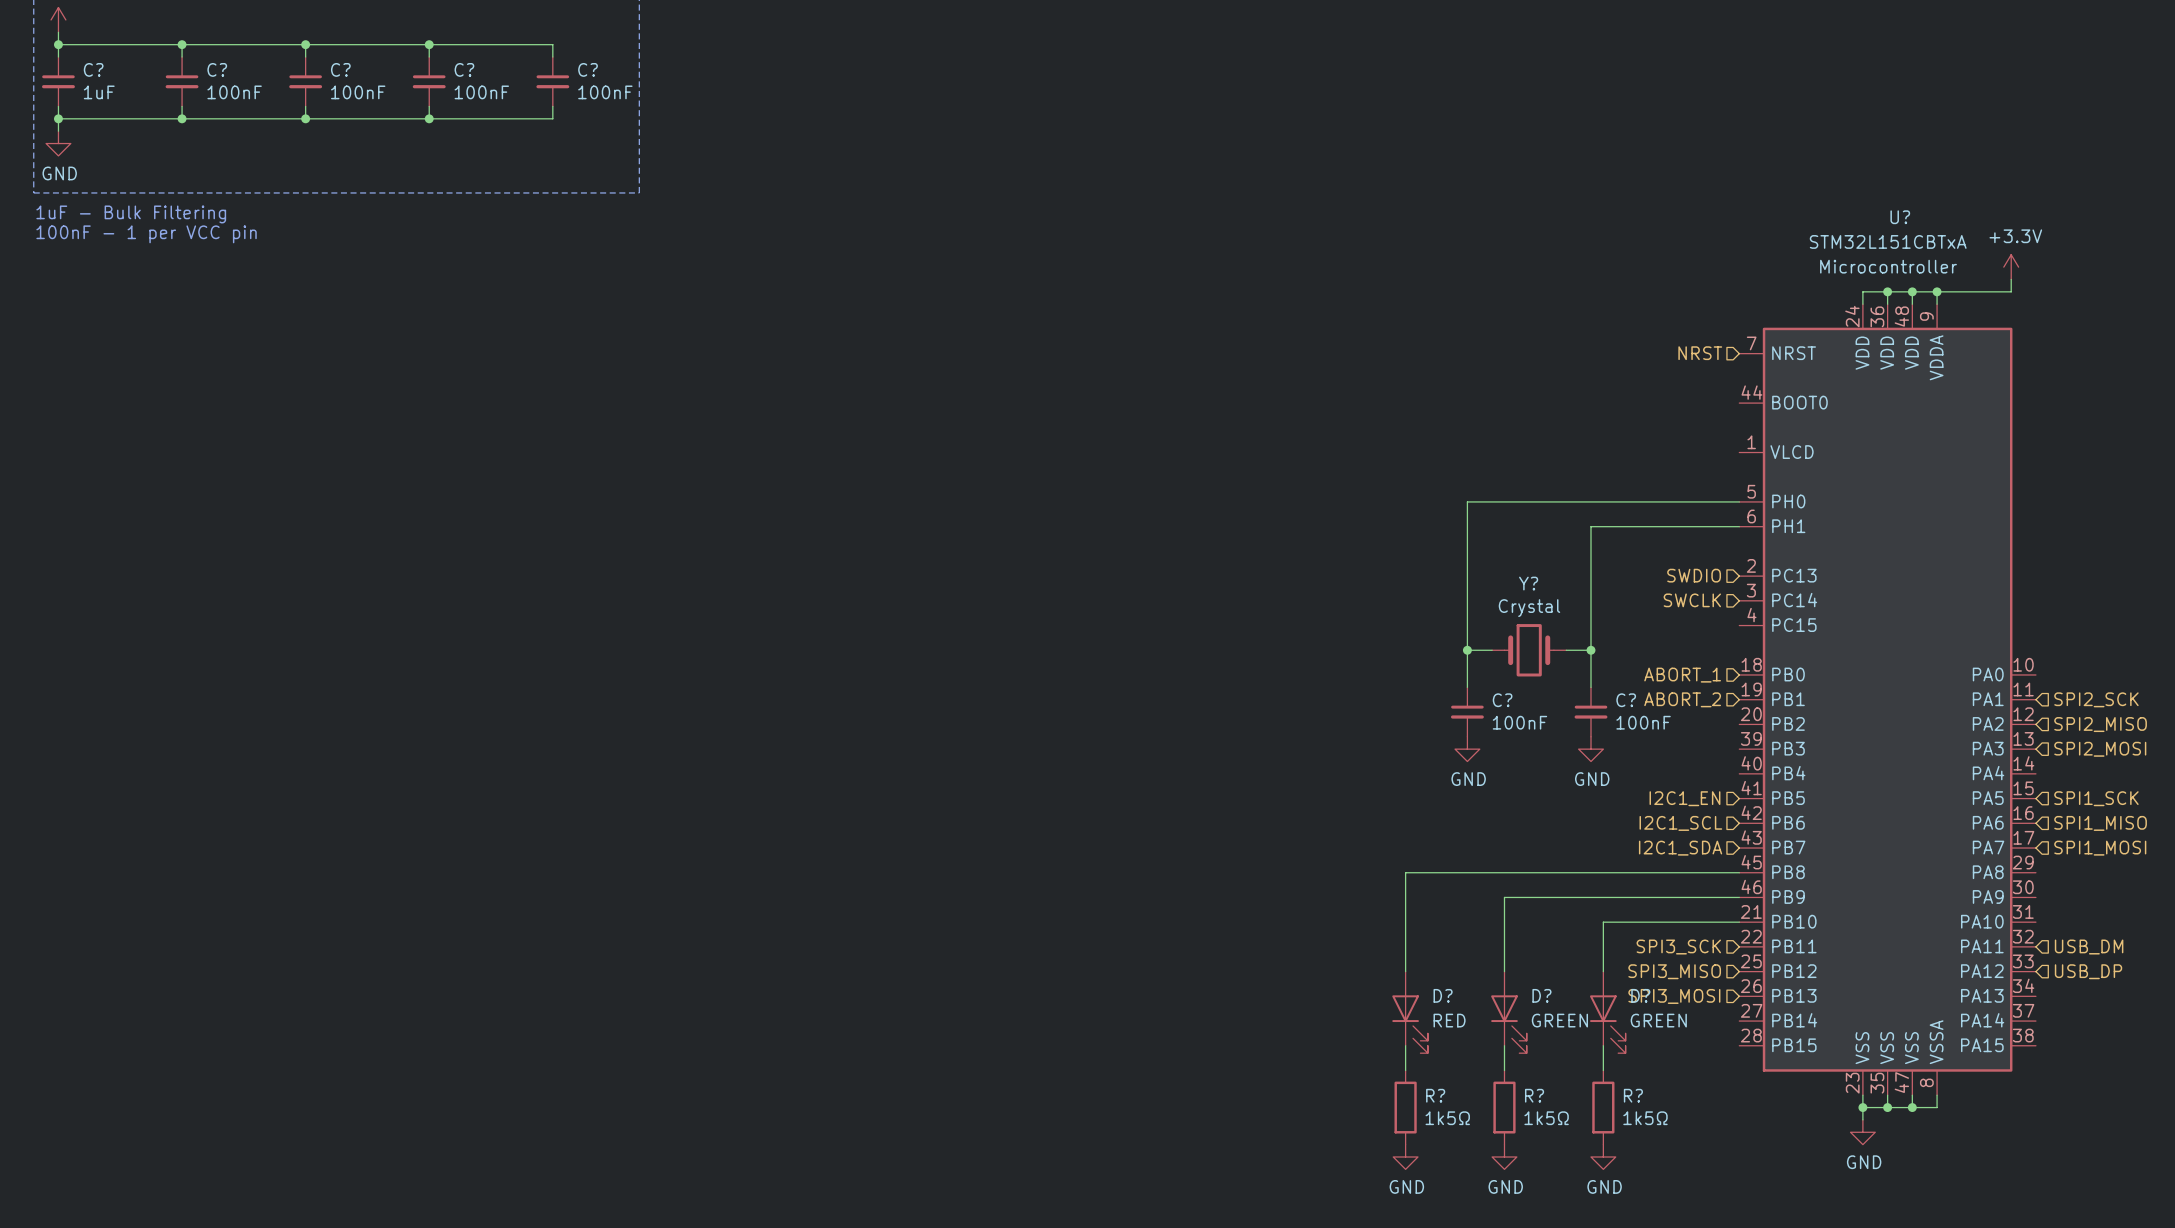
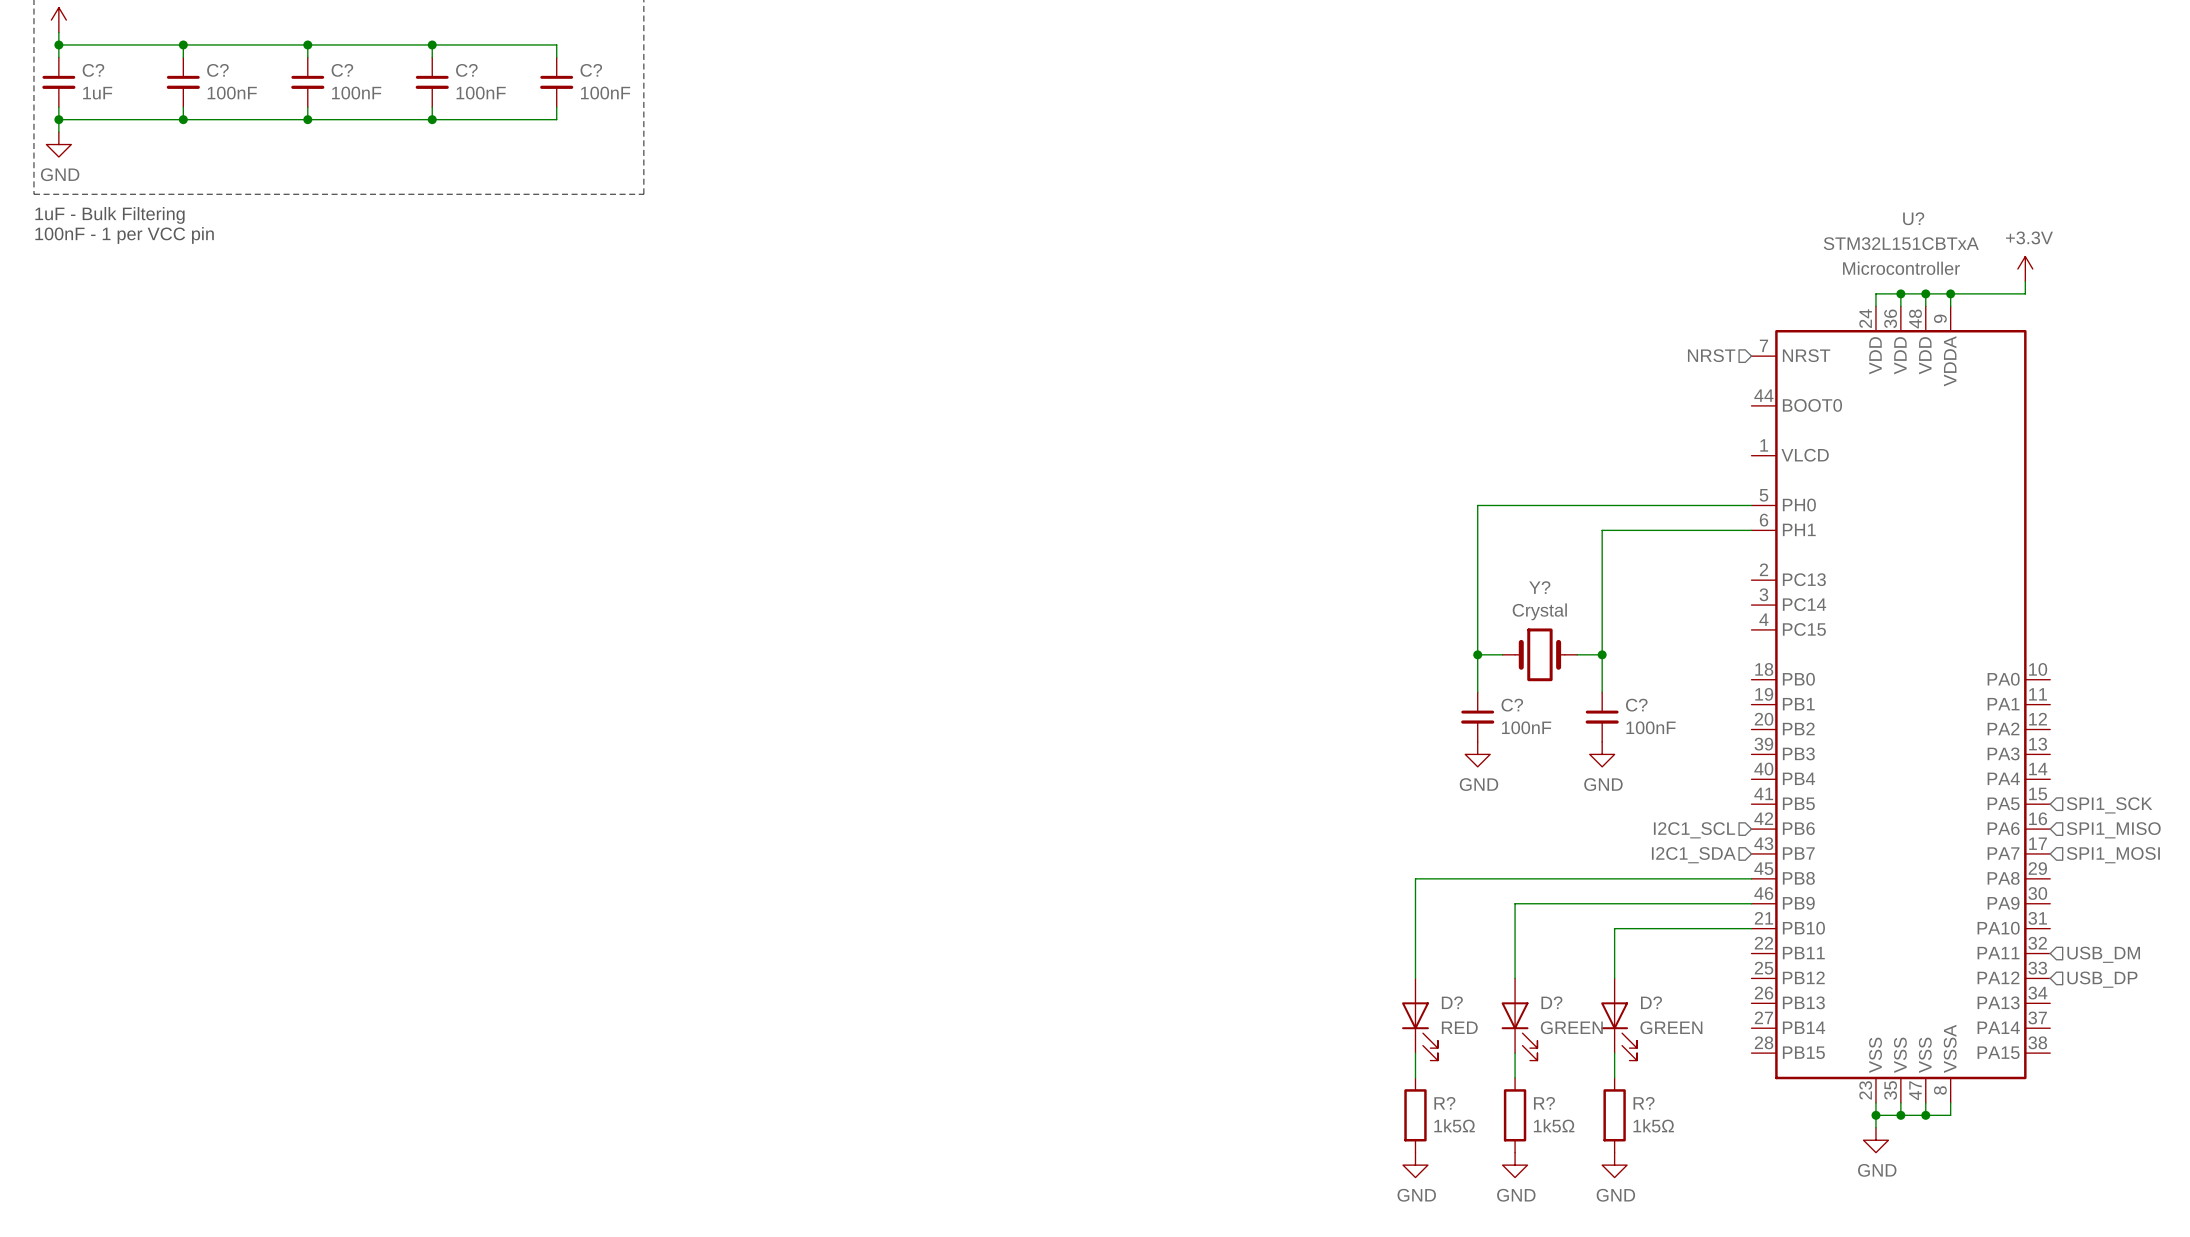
hierarchical label: SWDIO (1694, 575) -> none
hierarchical label: SWCLK (1692, 600) -> none
hierarchical label: ABORT_1 (1682, 675) -> none
hierarchical label: ABORT_2 (1682, 699) -> none
hierarchical label: SPI2_SCK (2096, 699) -> none
hierarchical label: SPI2_MISO (2100, 724) -> none
hierarchical label: SPI2_MOSI (2100, 749) -> none
hierarchical label: I2C1_EN (1684, 798) -> none
hierarchical label: SPI3_SCK (1678, 947) -> none
hierarchical label: SPI3_MISO (1674, 971) -> none
hierarchical label: SPI3_MOSI (1674, 996) -> none

